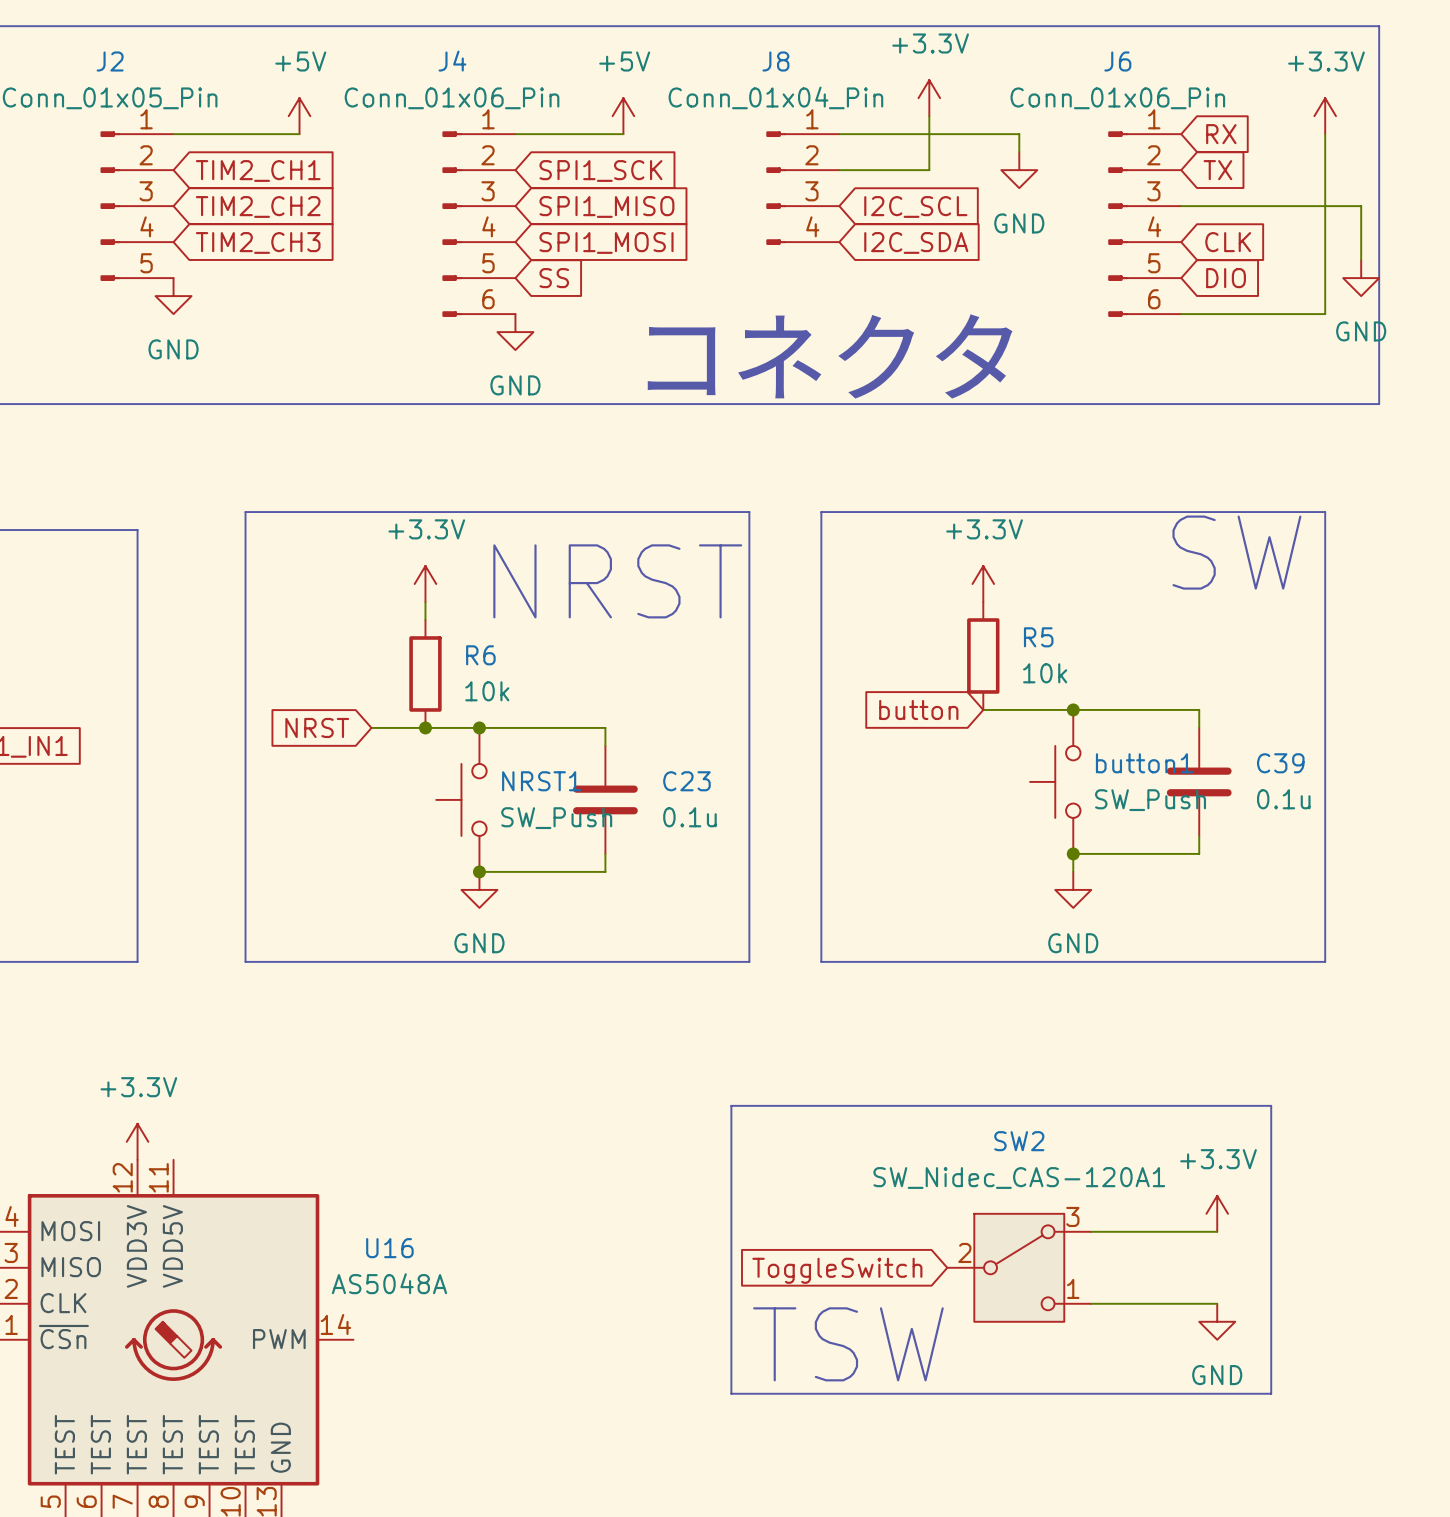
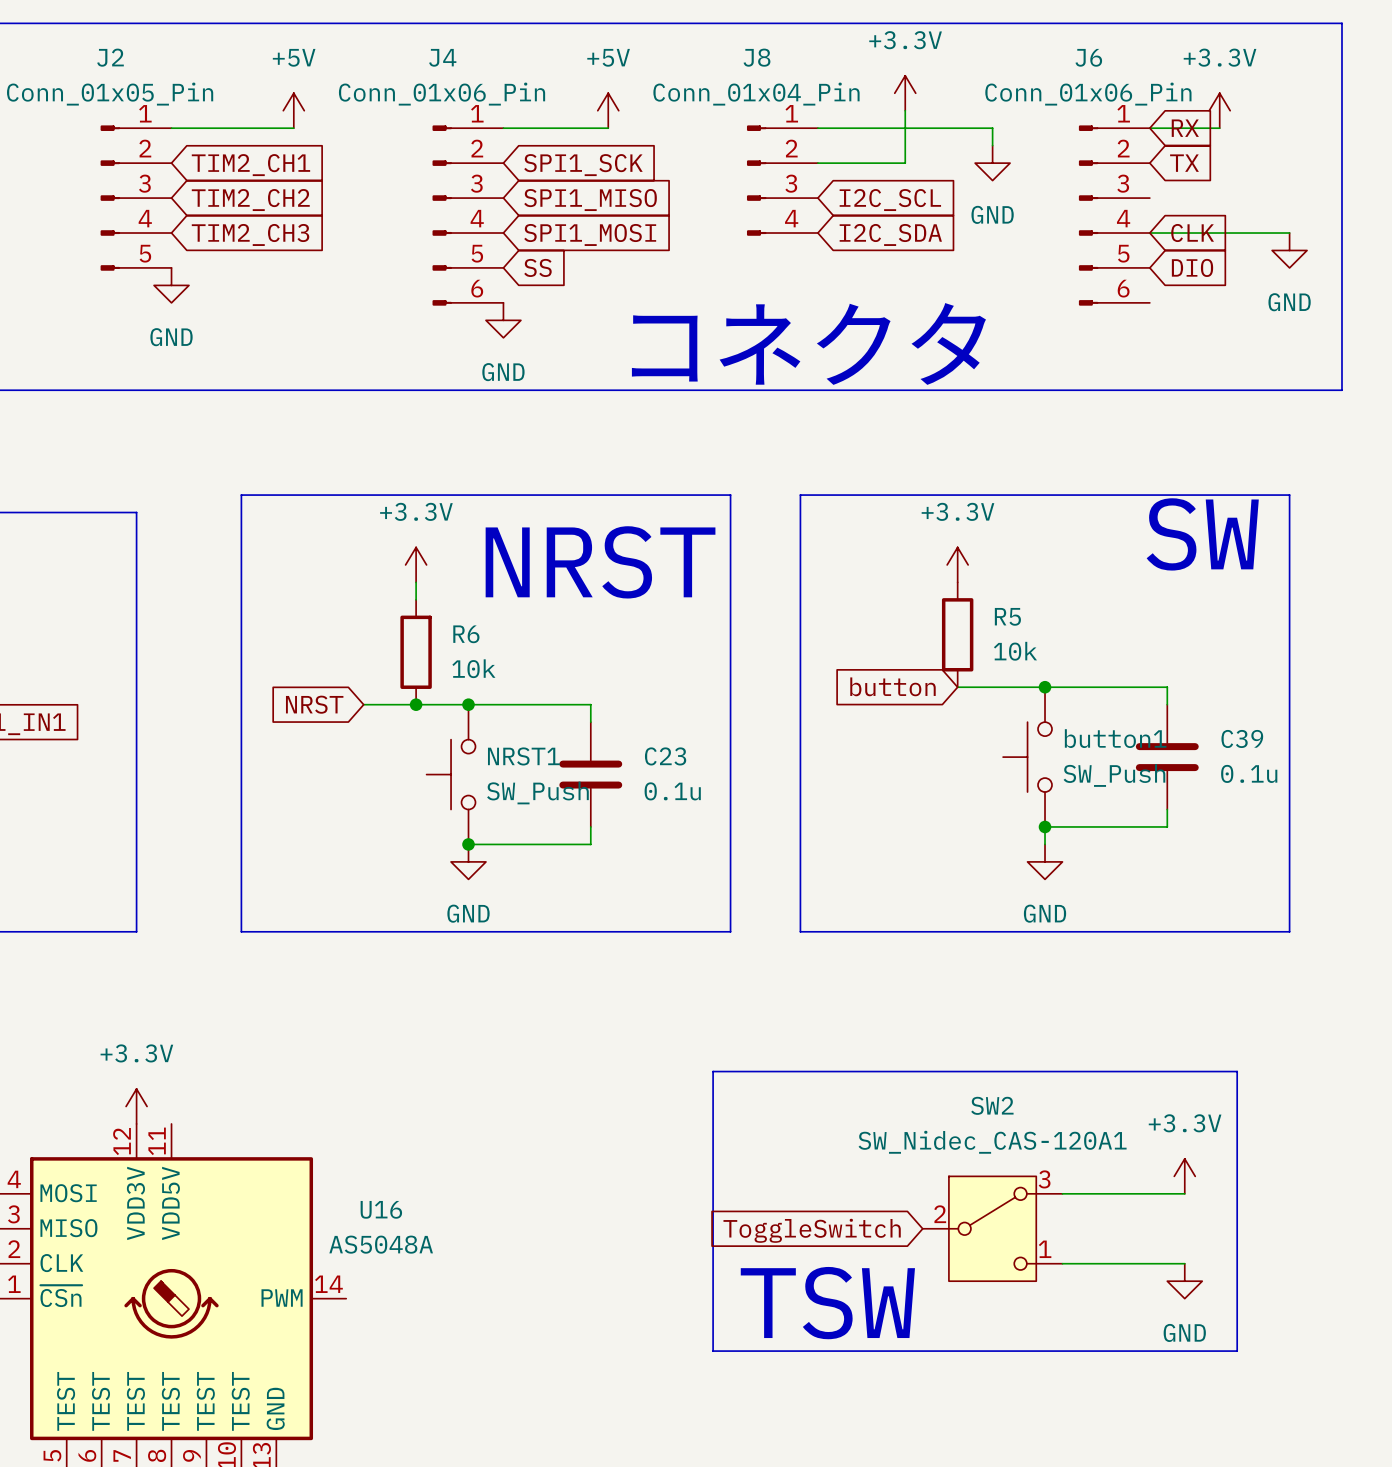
power symbol position: +3.3V (1325, 116) -> +3.3V (1219, 110)
wire: none -> (1149, 128) (1219, 128)
wire: (1325, 134) (1325, 314) (1181, 314) -> none
wire: (1181, 206) (1361, 206) (1361, 260) -> none
wire: none -> (1149, 233) (1289, 233)
power symbol position: GND (1361, 278) -> GND (1289, 250)

